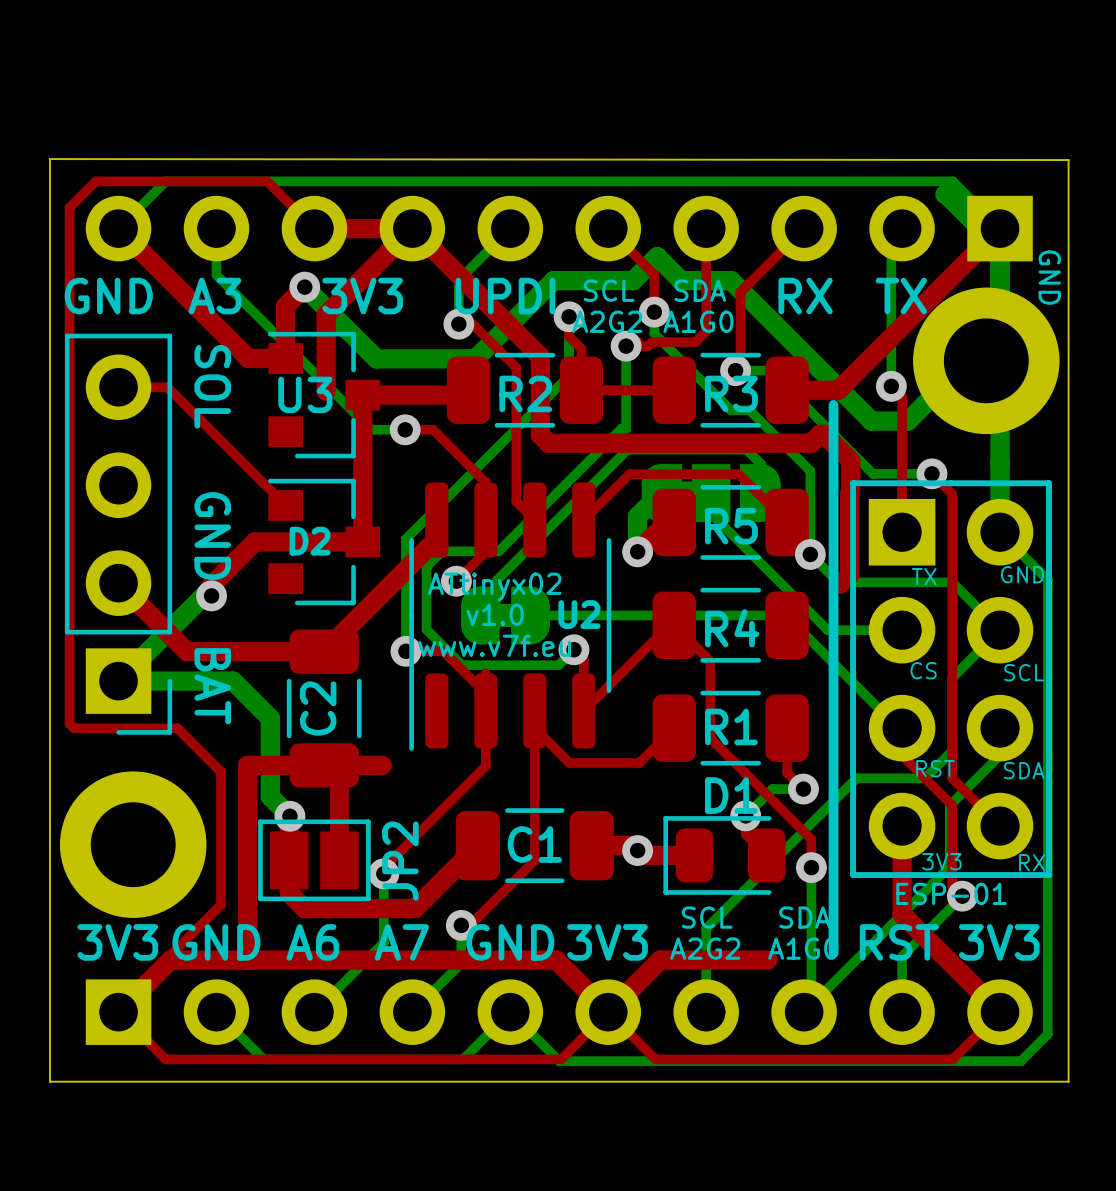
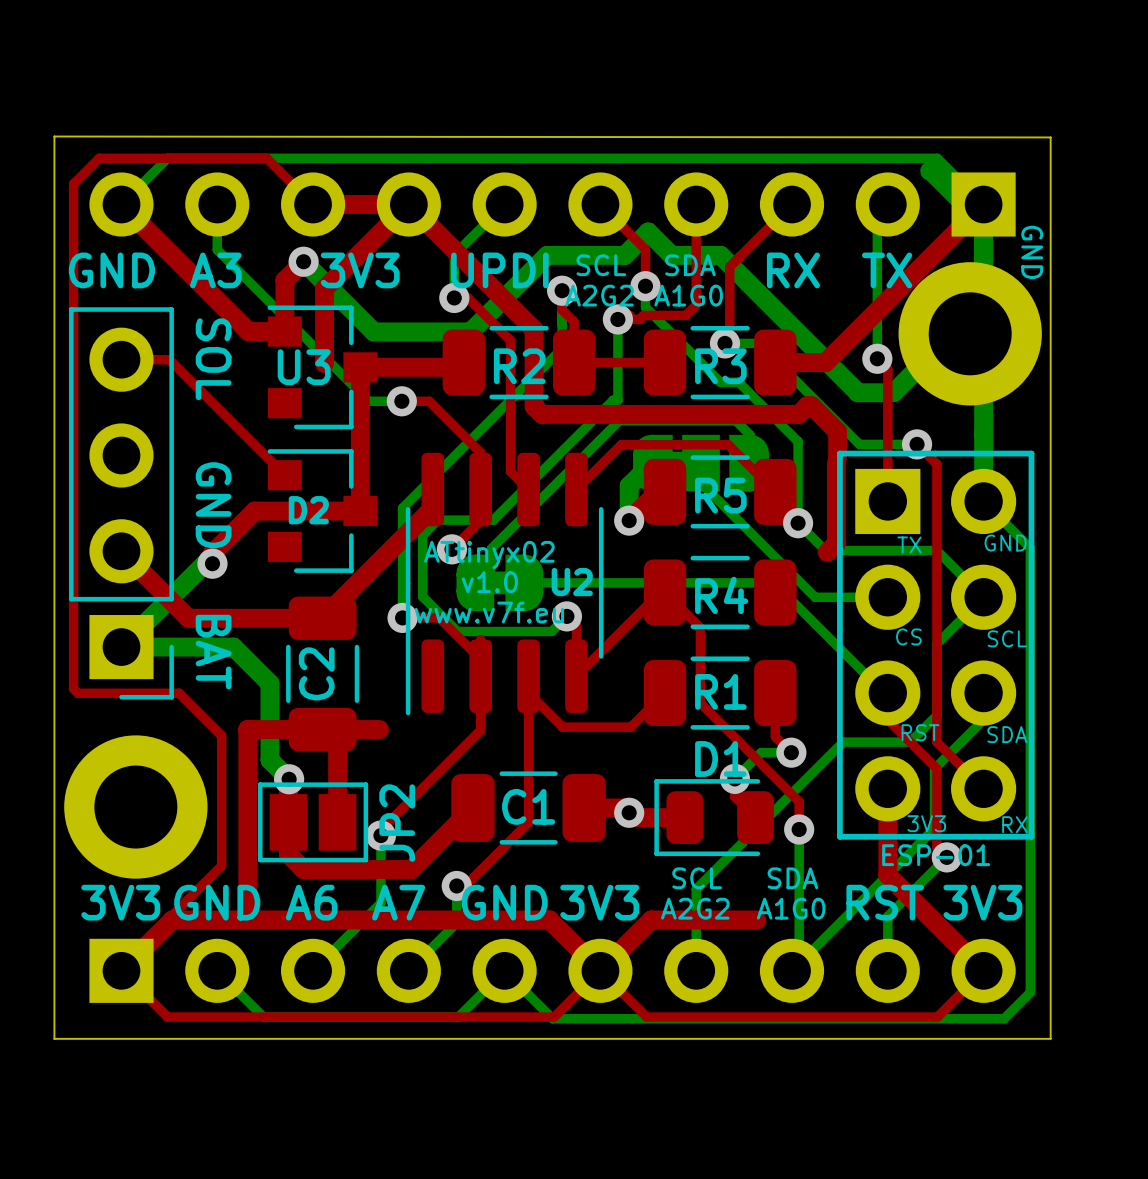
part footprint: [828, 400, 1052, 959] -> [837, 450, 1035, 840]

